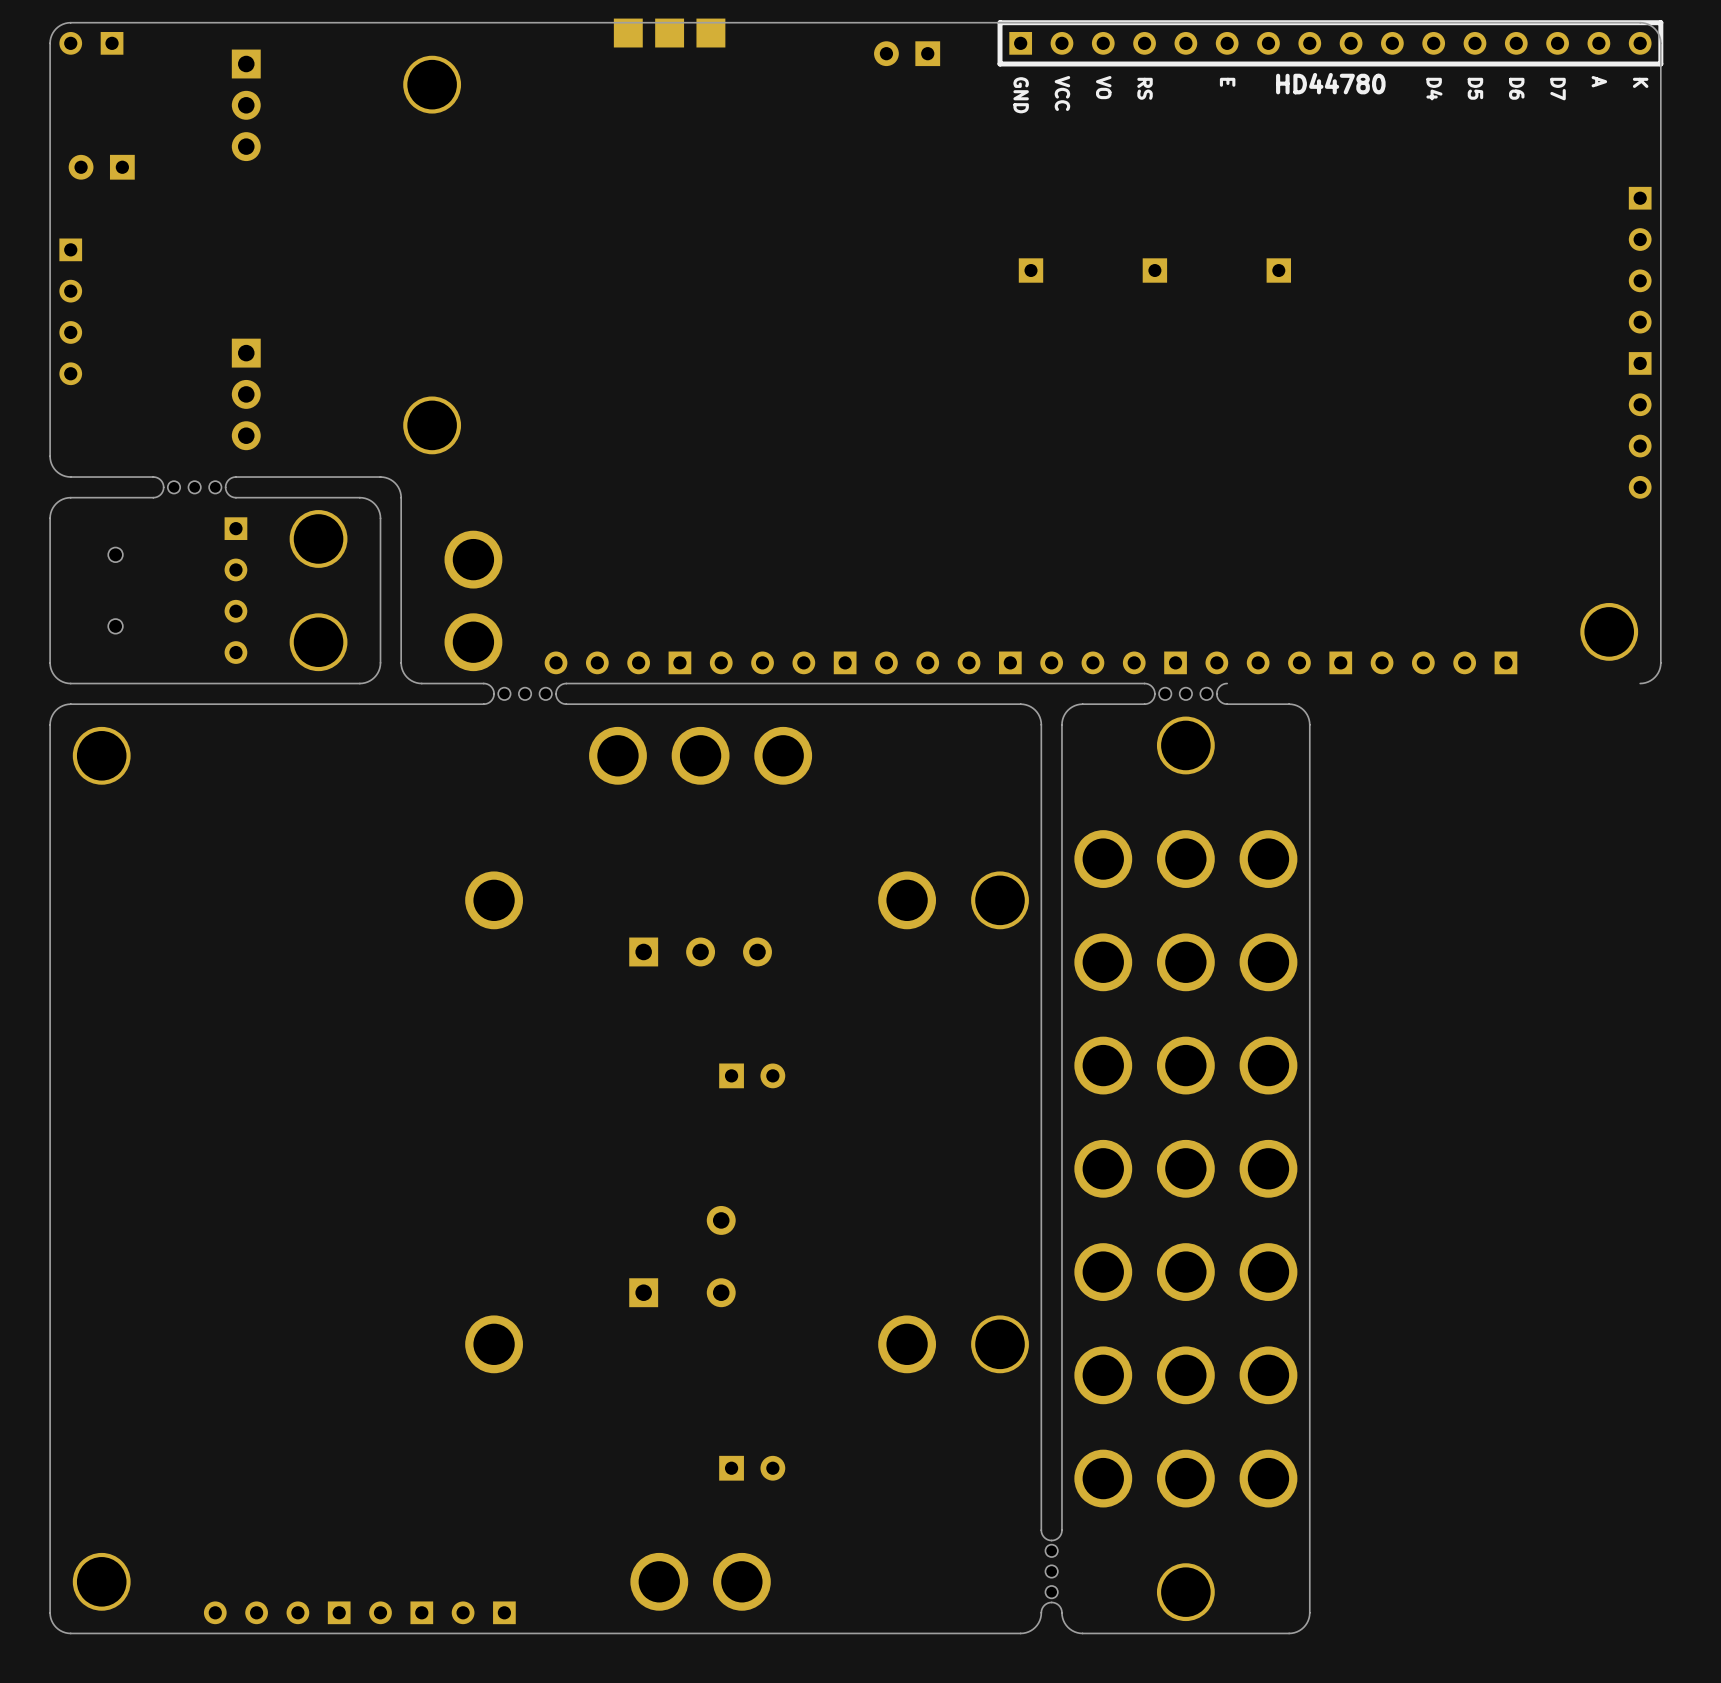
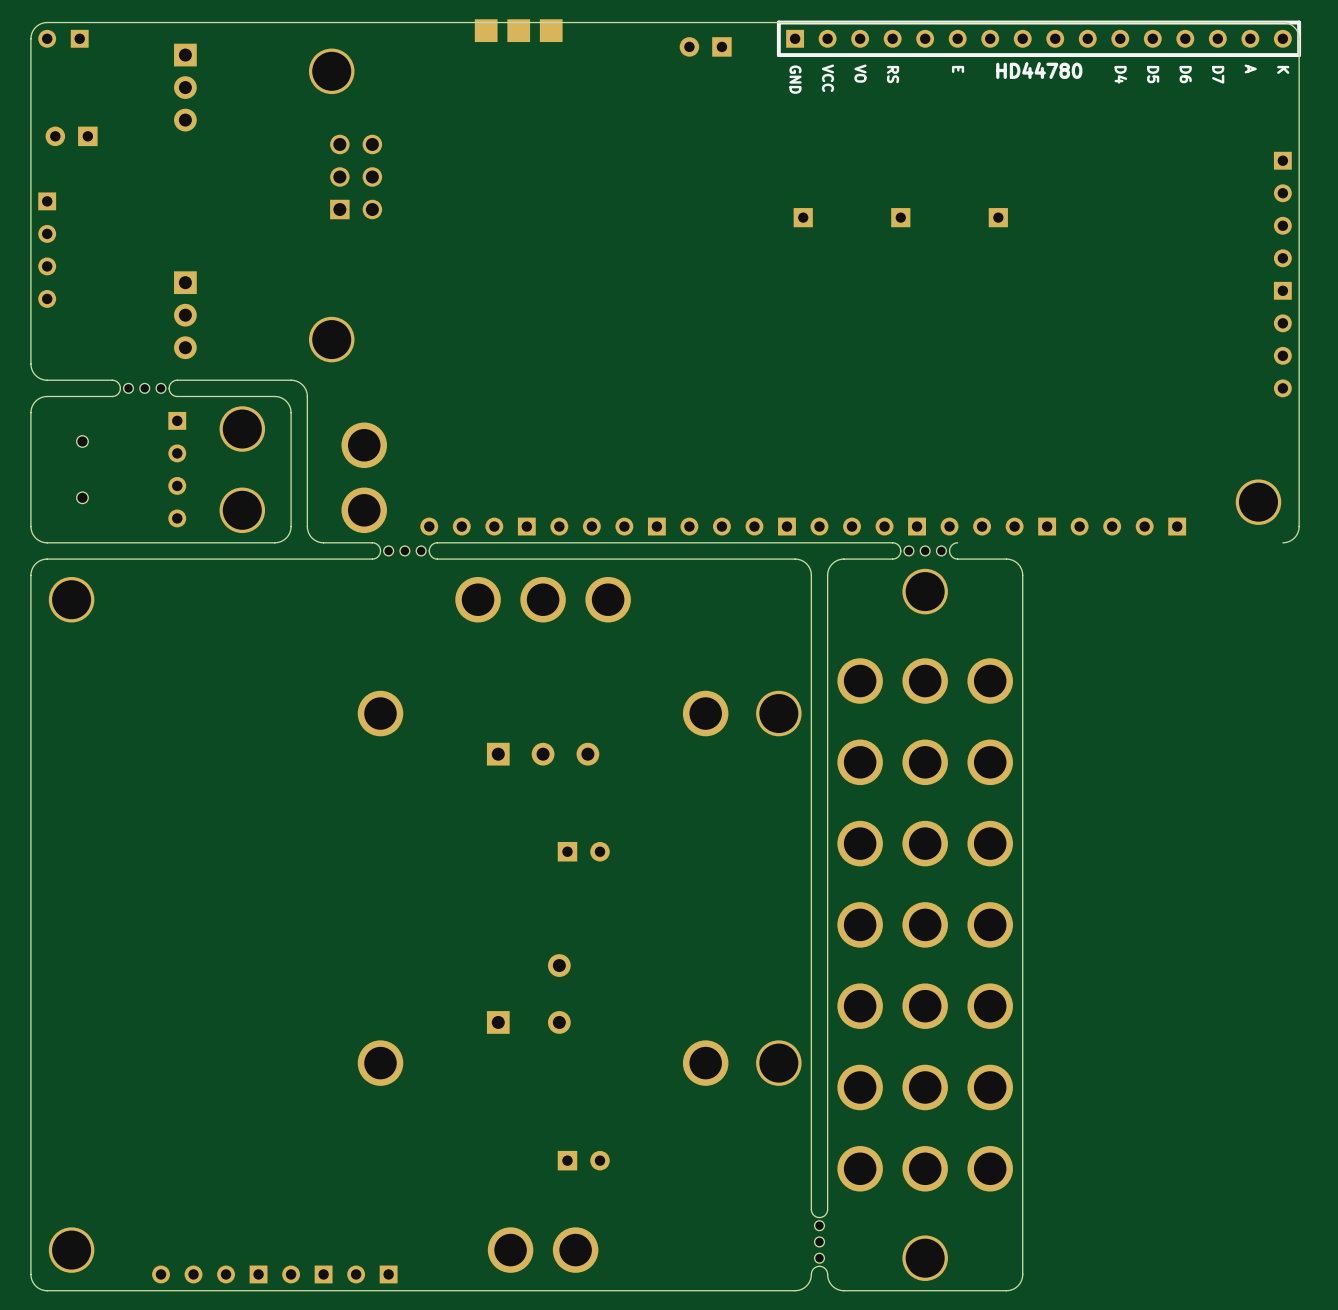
part: none -> (356, 176)

